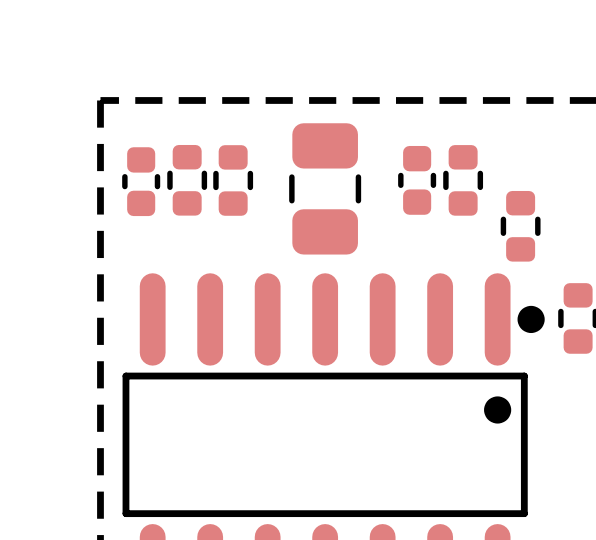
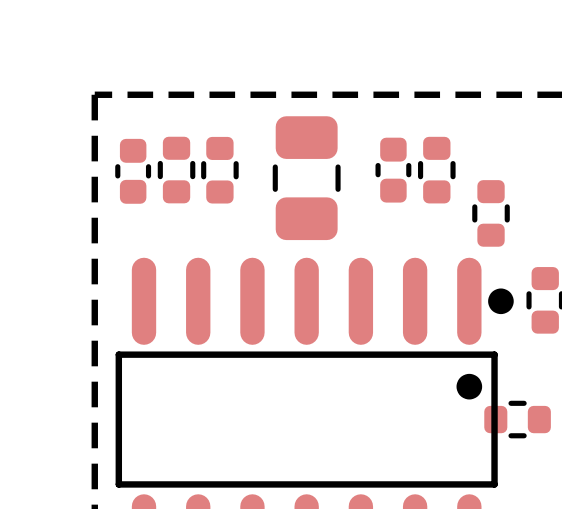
part: none -> (517, 419)

